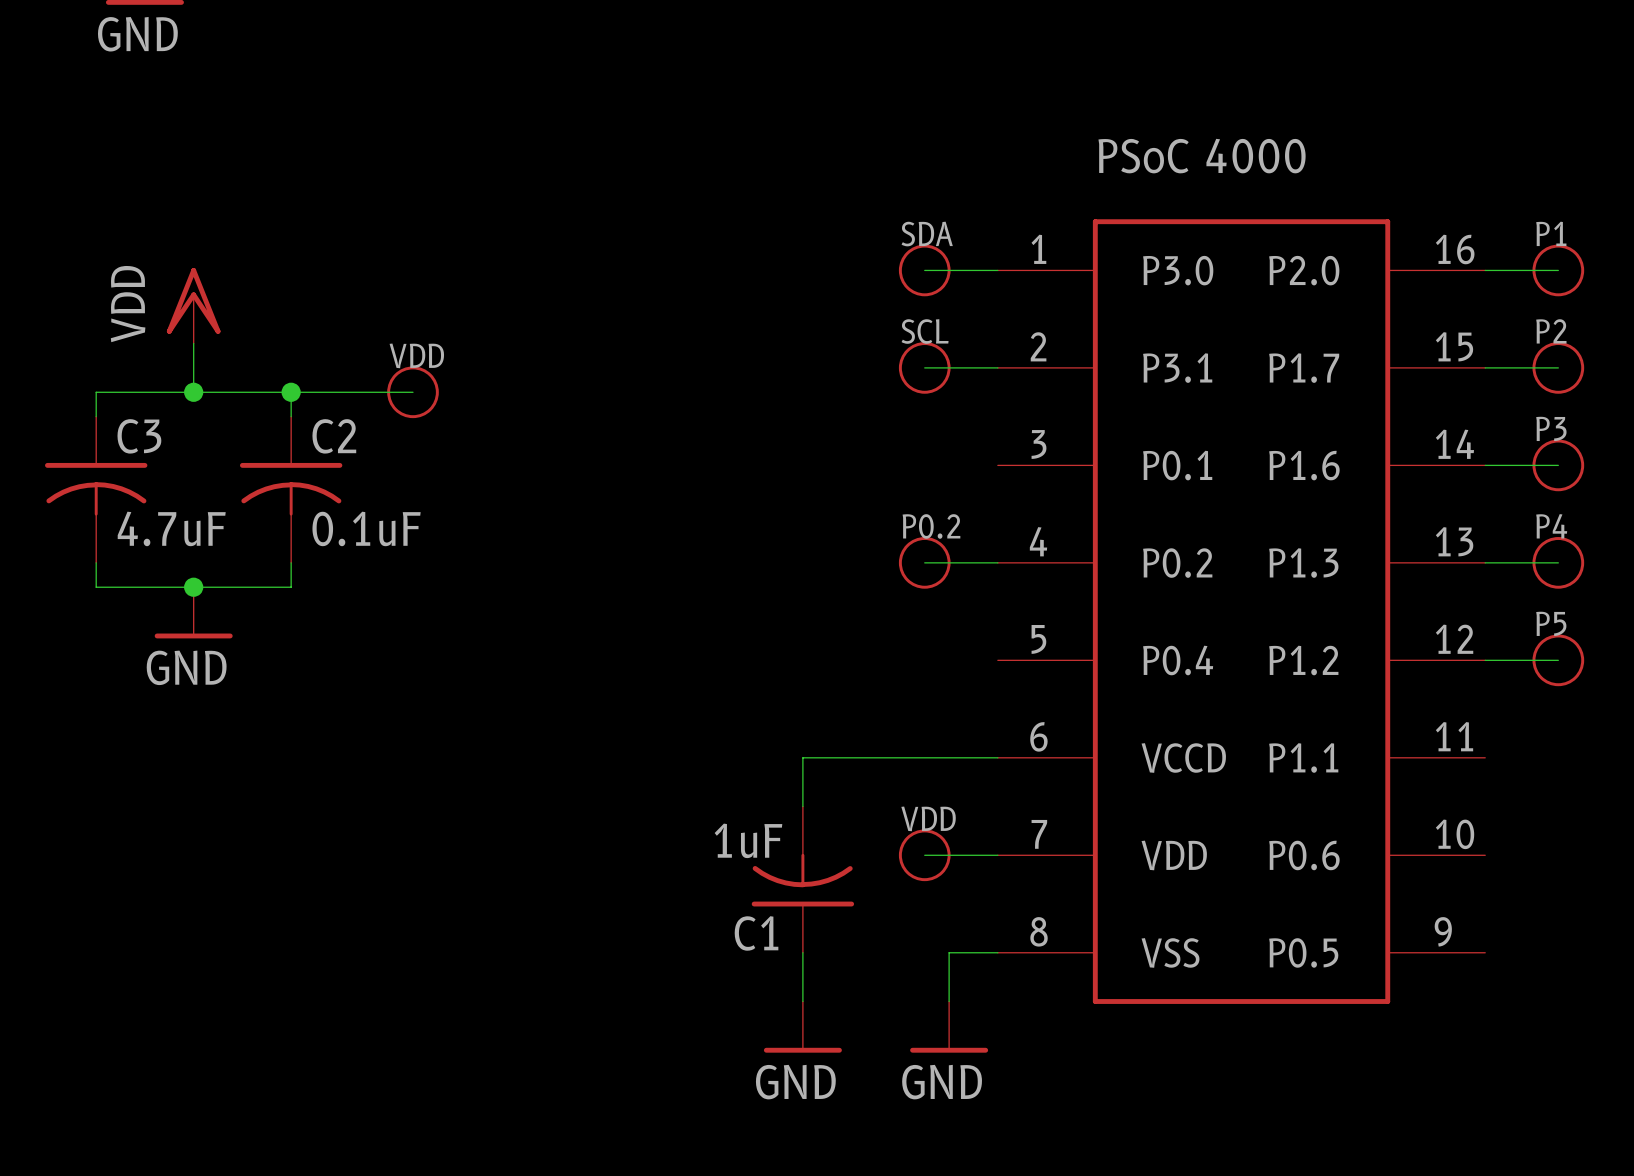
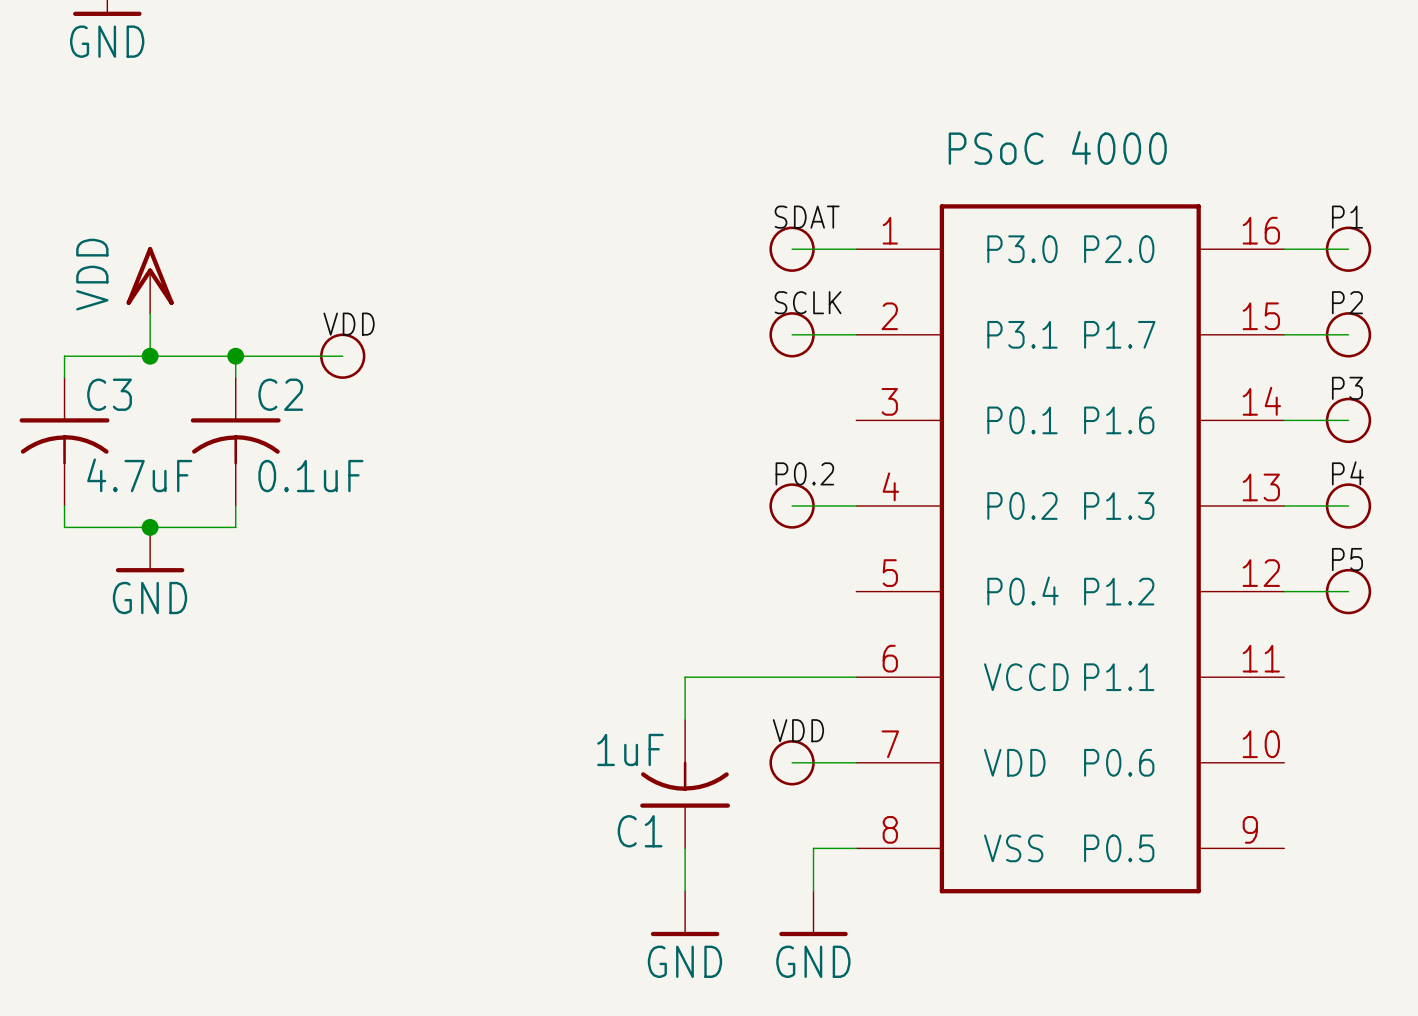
label: SDA (927, 234) -> SDAT (807, 217)
label: SCL (925, 331) -> SCLK (808, 302)

